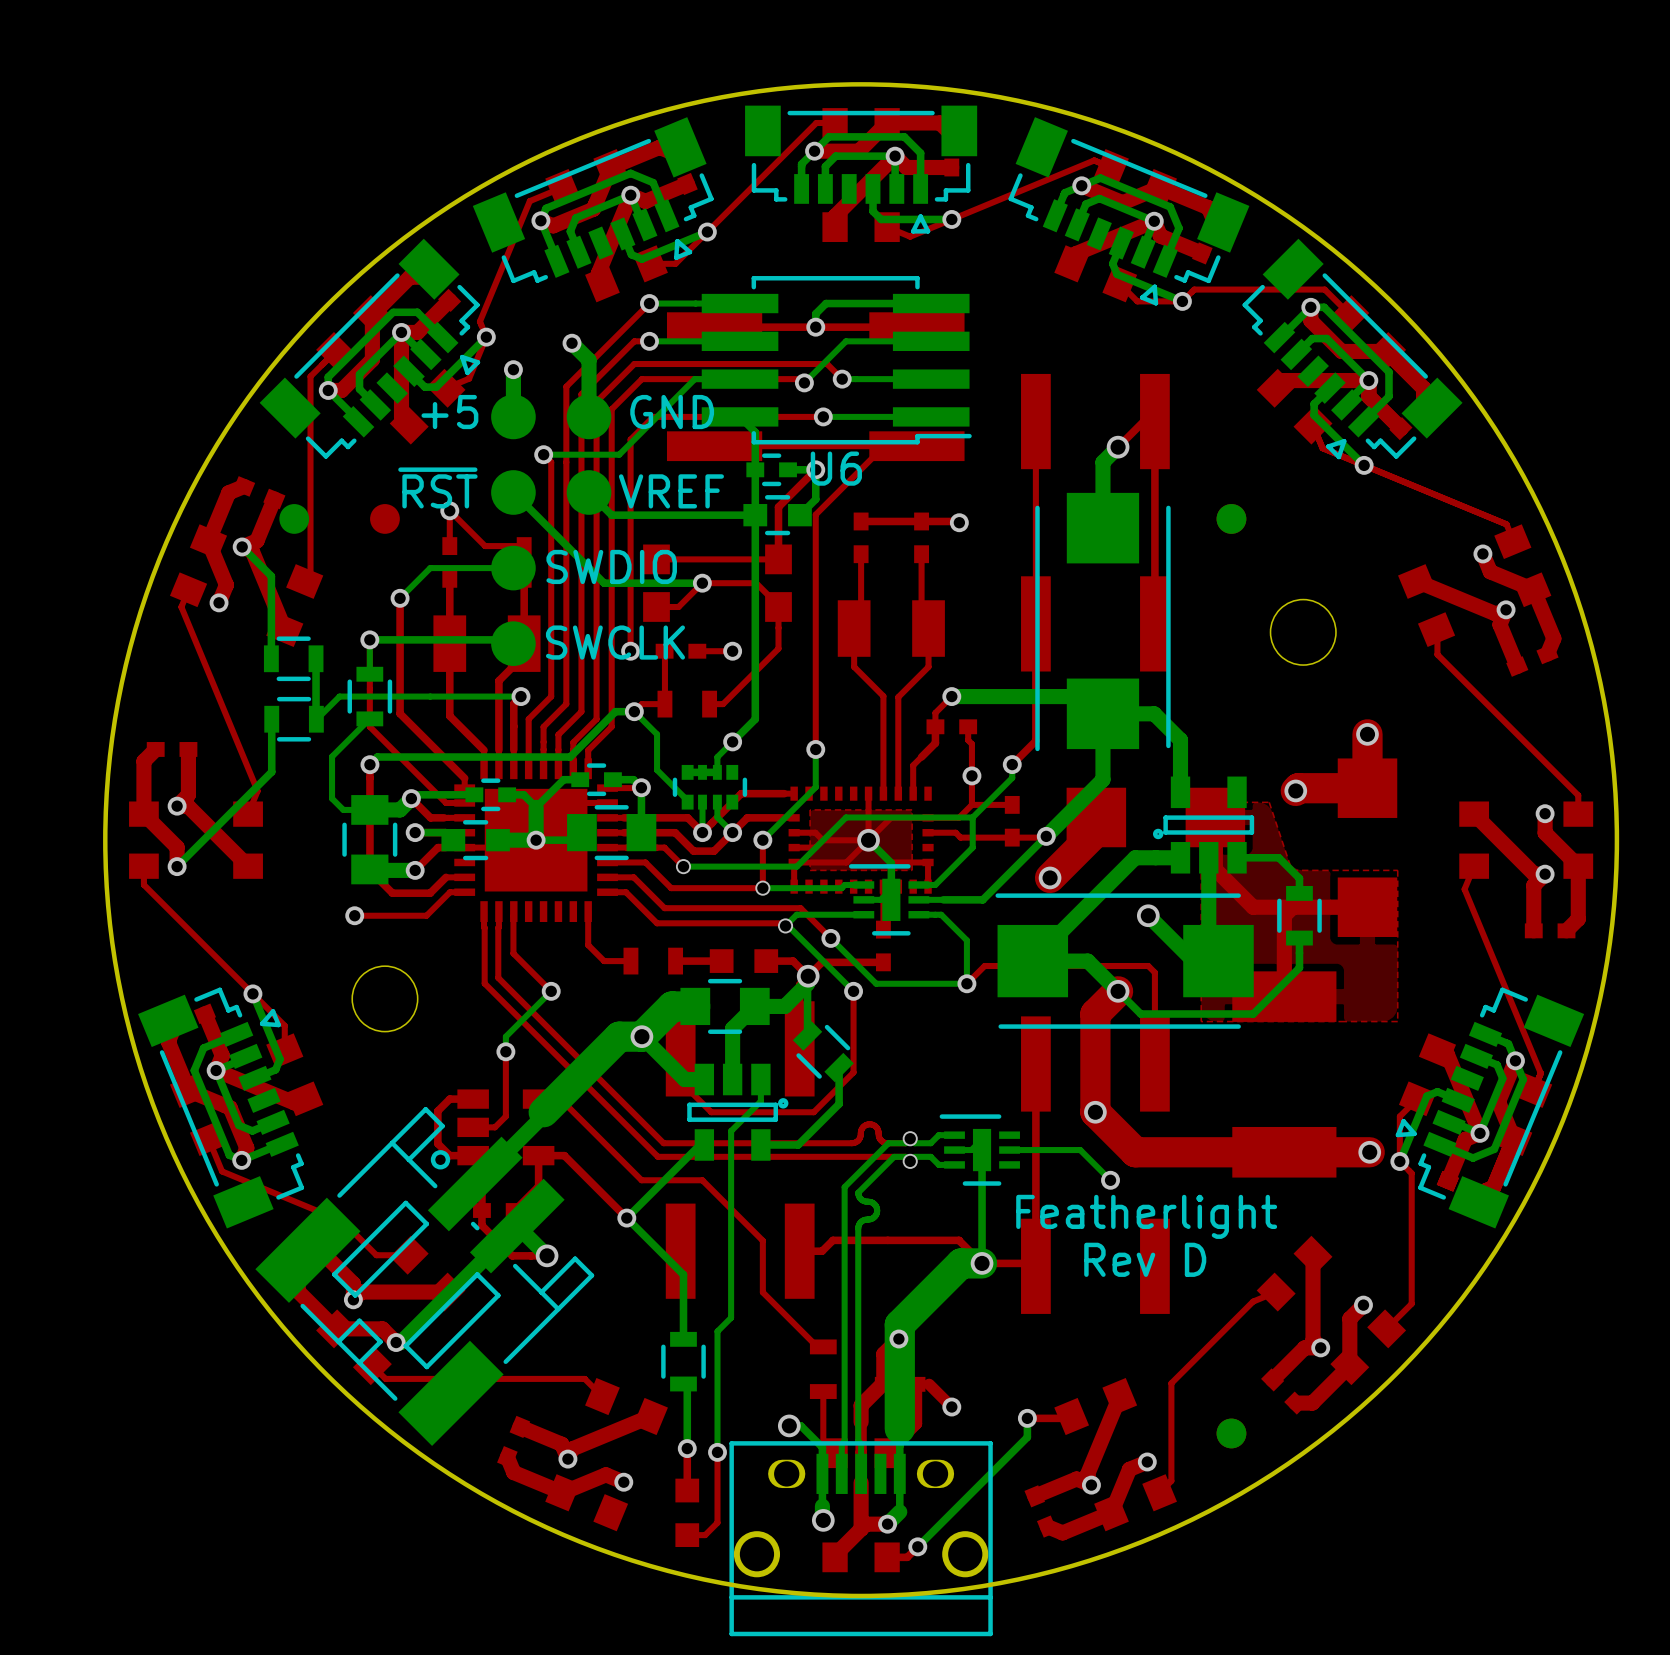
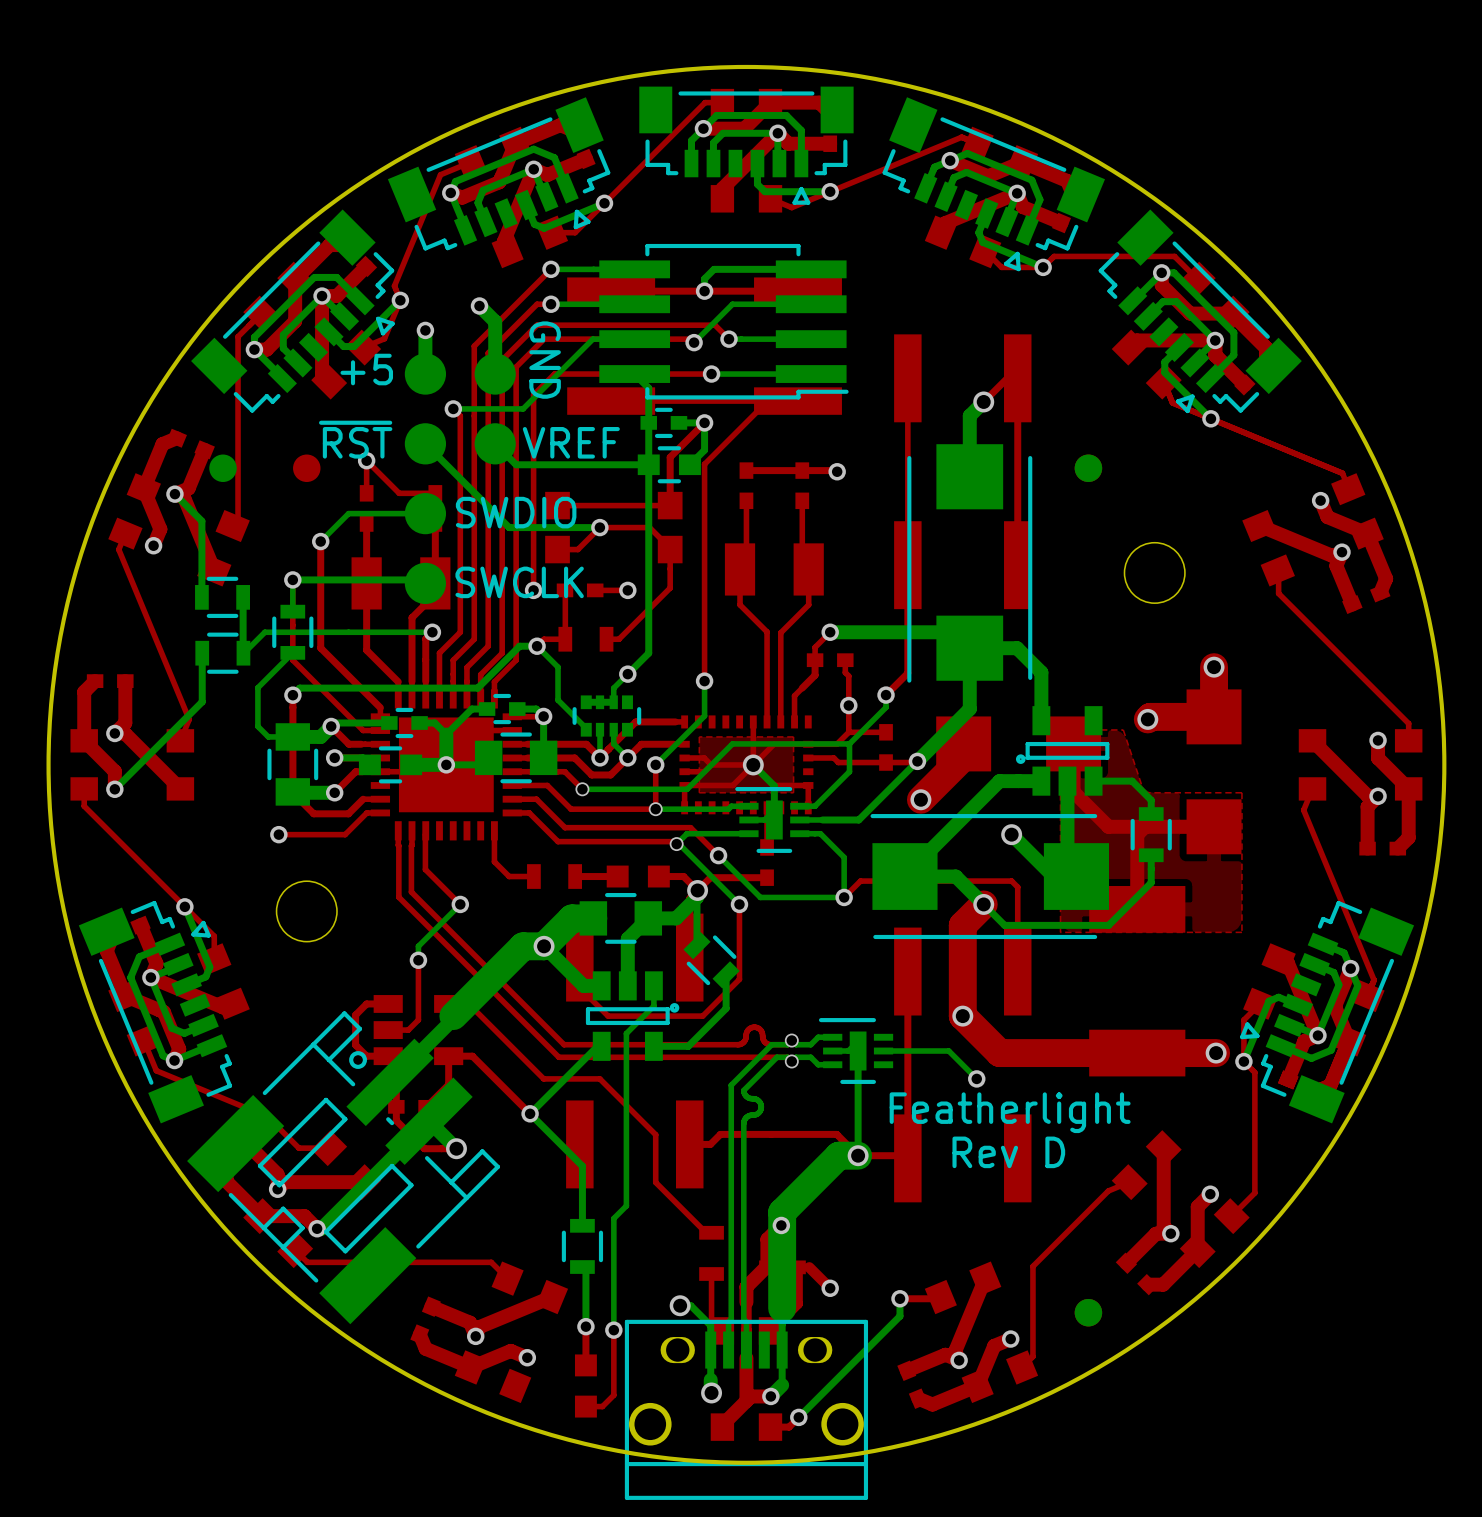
text rotation: 0° (672, 412) -> 90° clockwise (545, 360)
U6 name: U6 (836, 468) -> none

